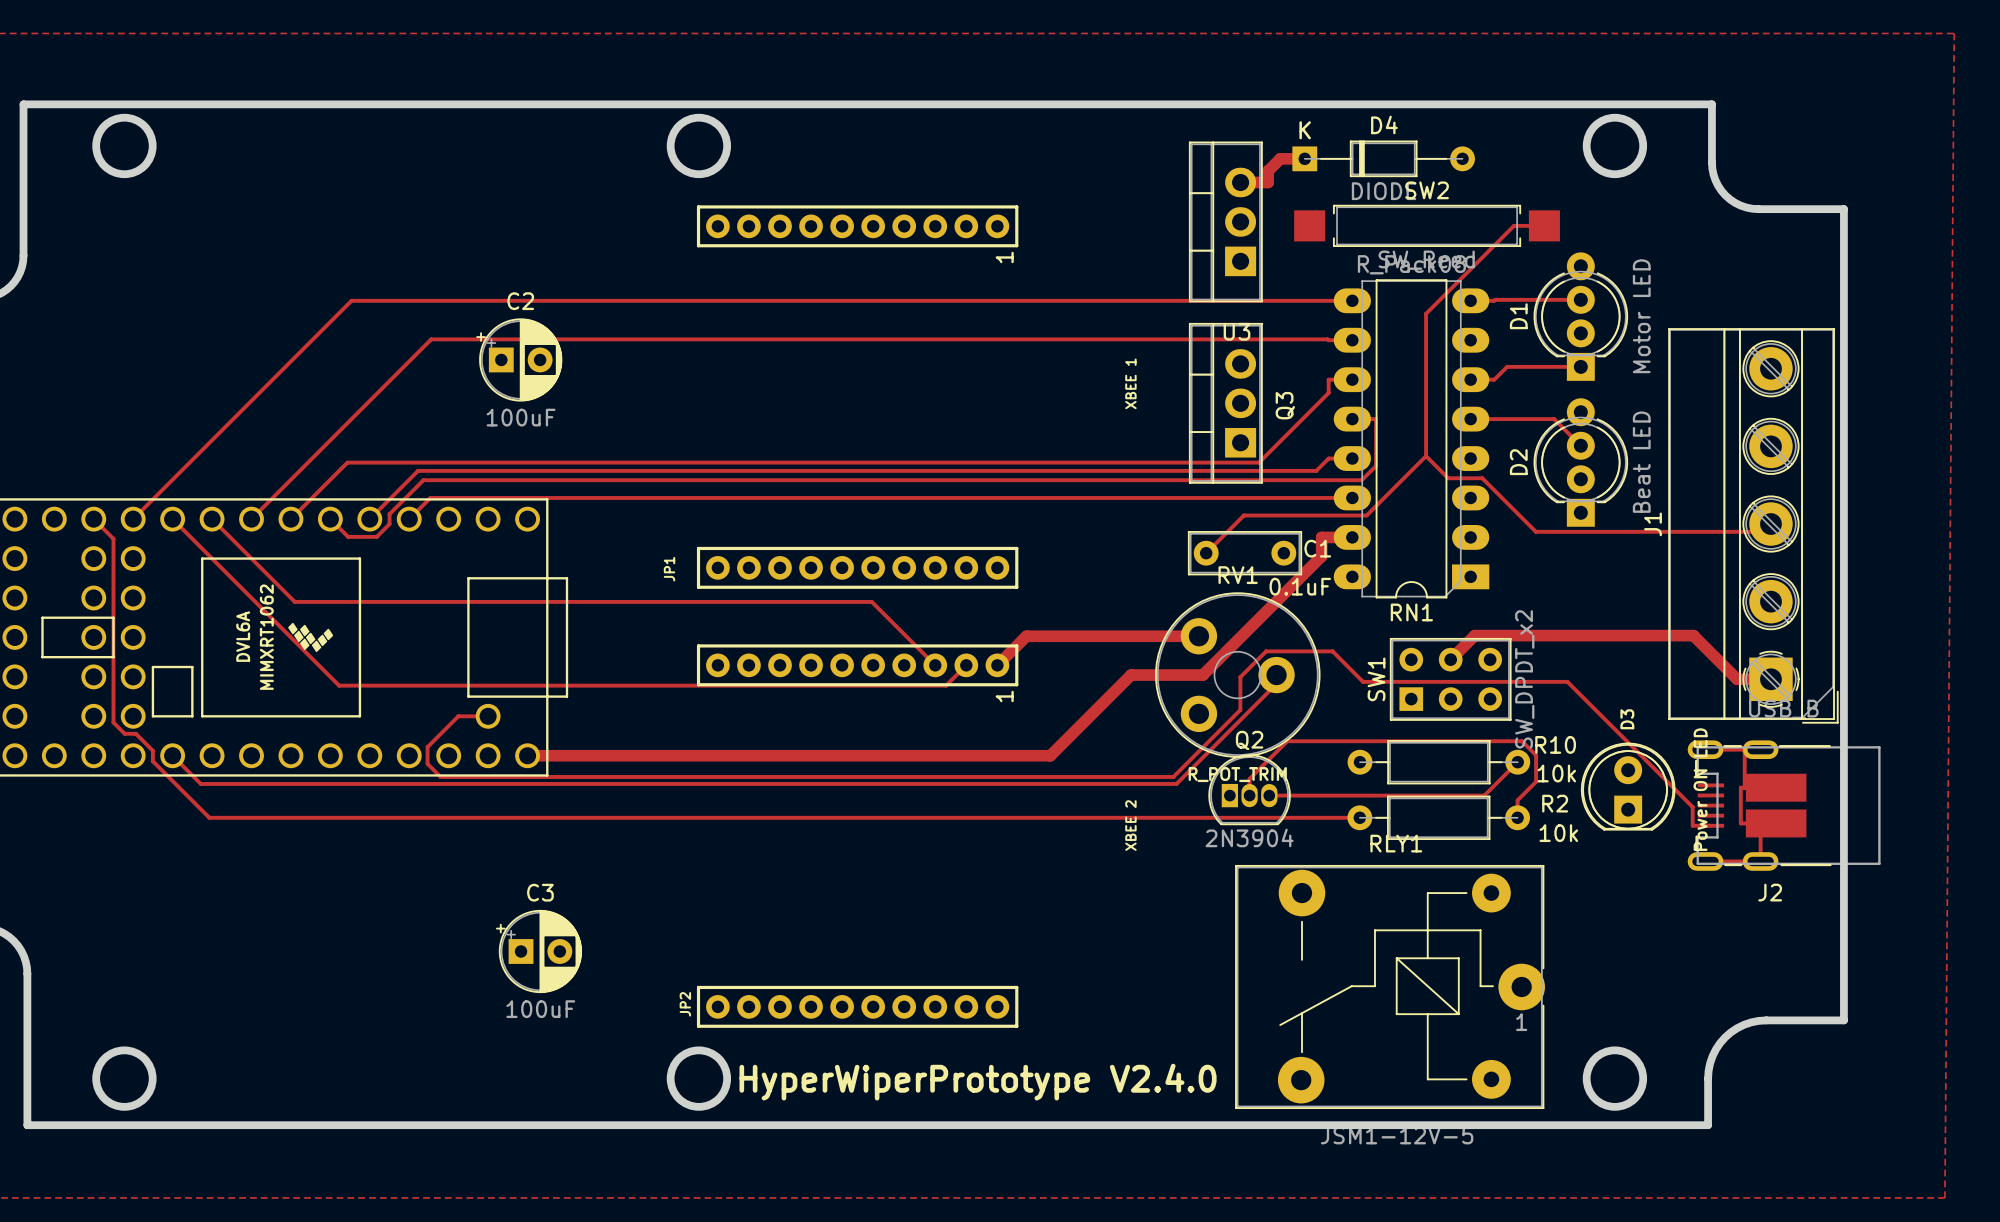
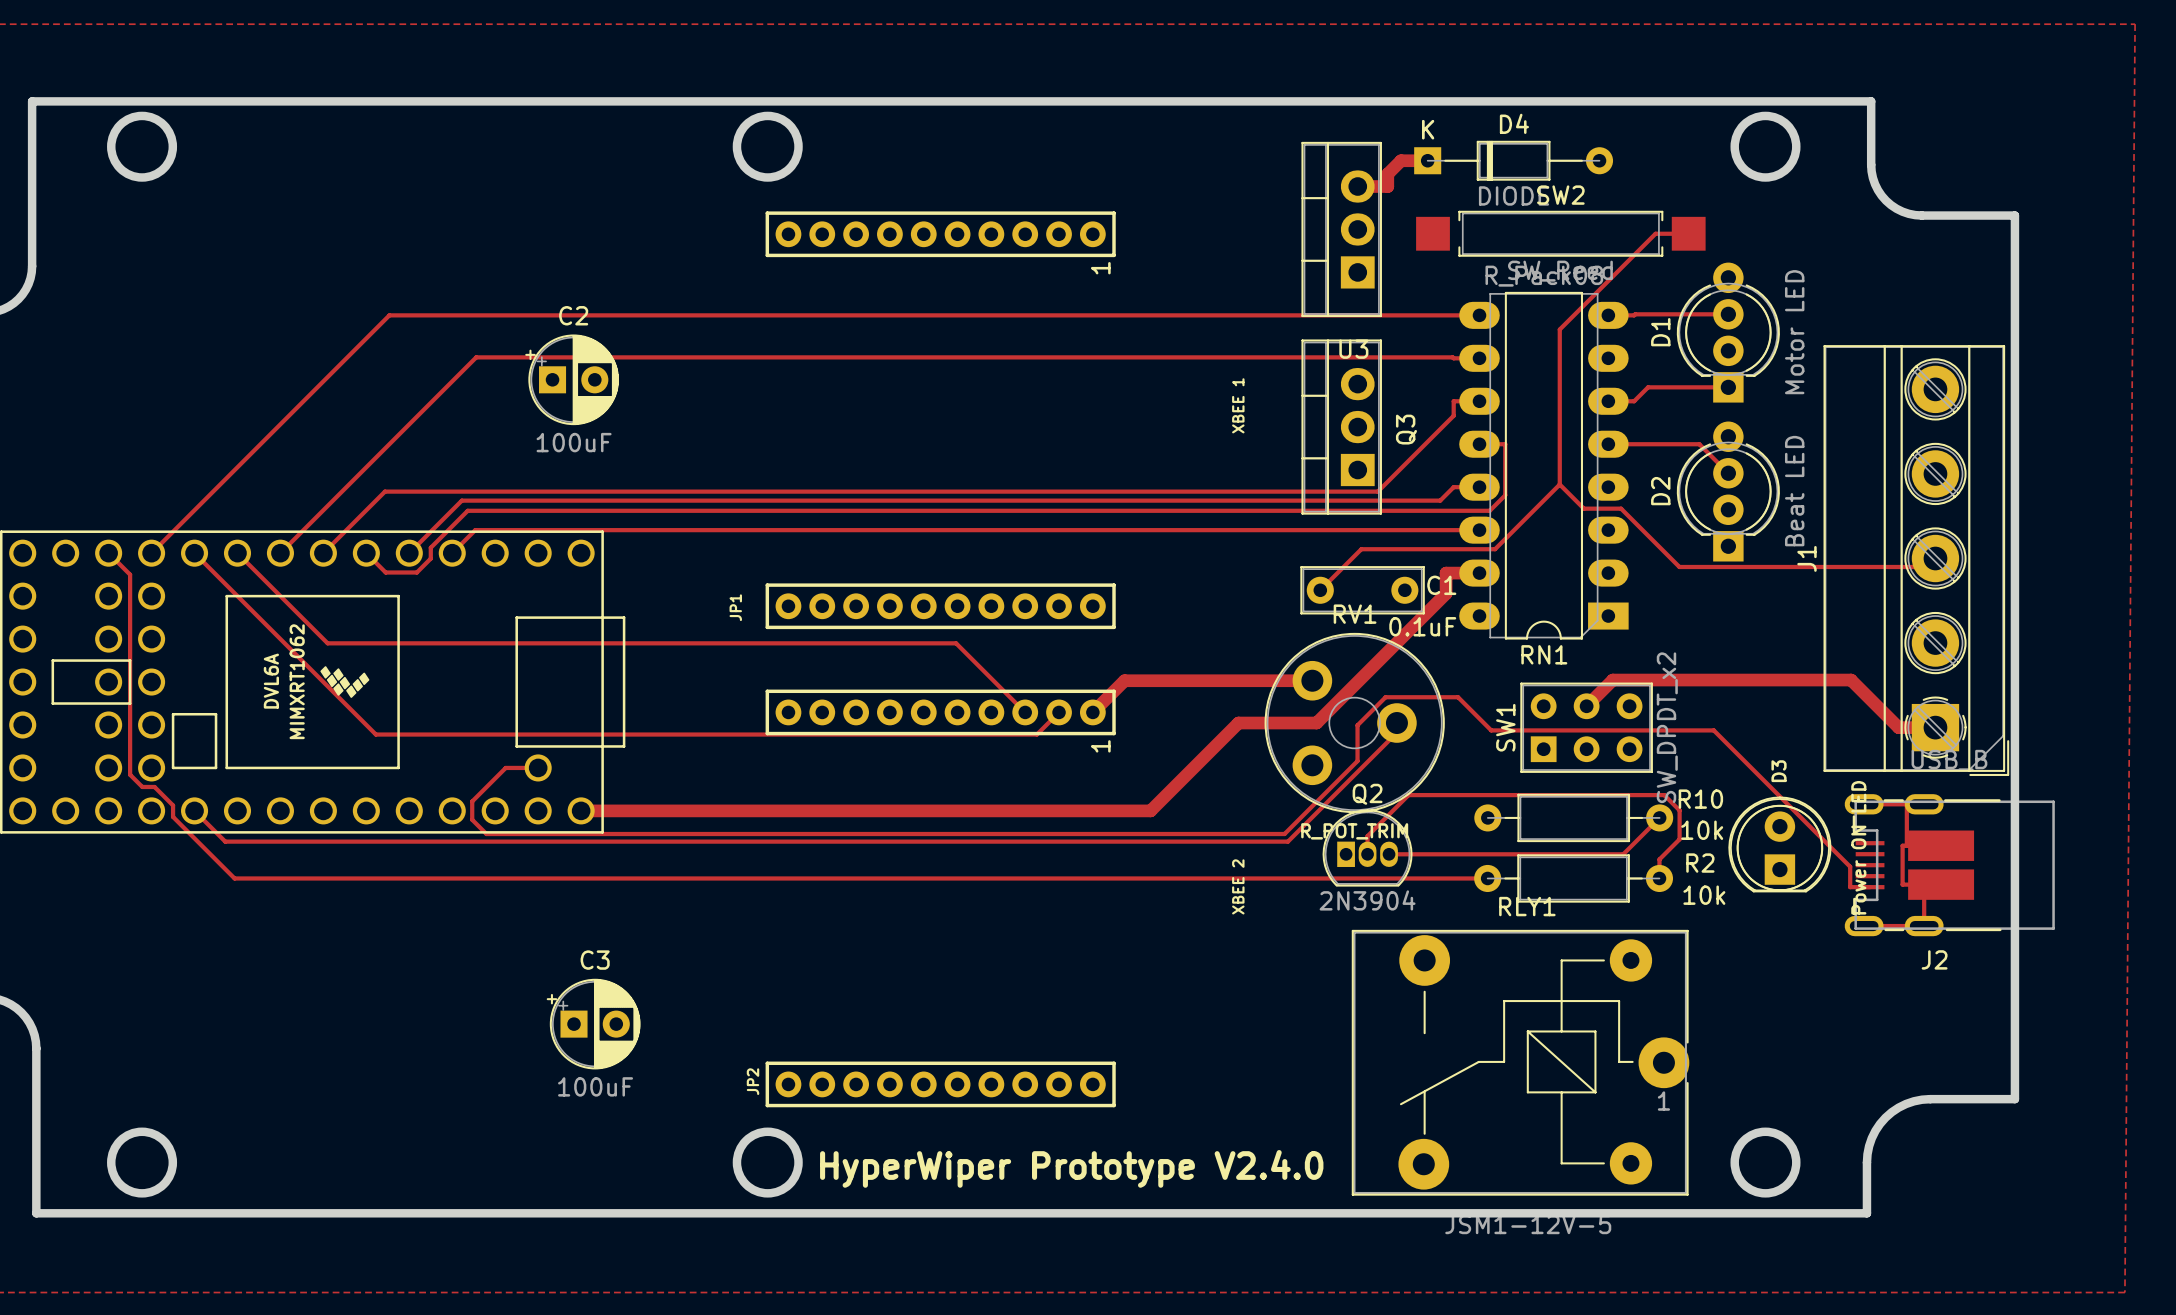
text: HyperWiperPrototype V2.4.0 (978, 1082) -> HyperWiper Prototype V2.4.0 (1071, 1168)

